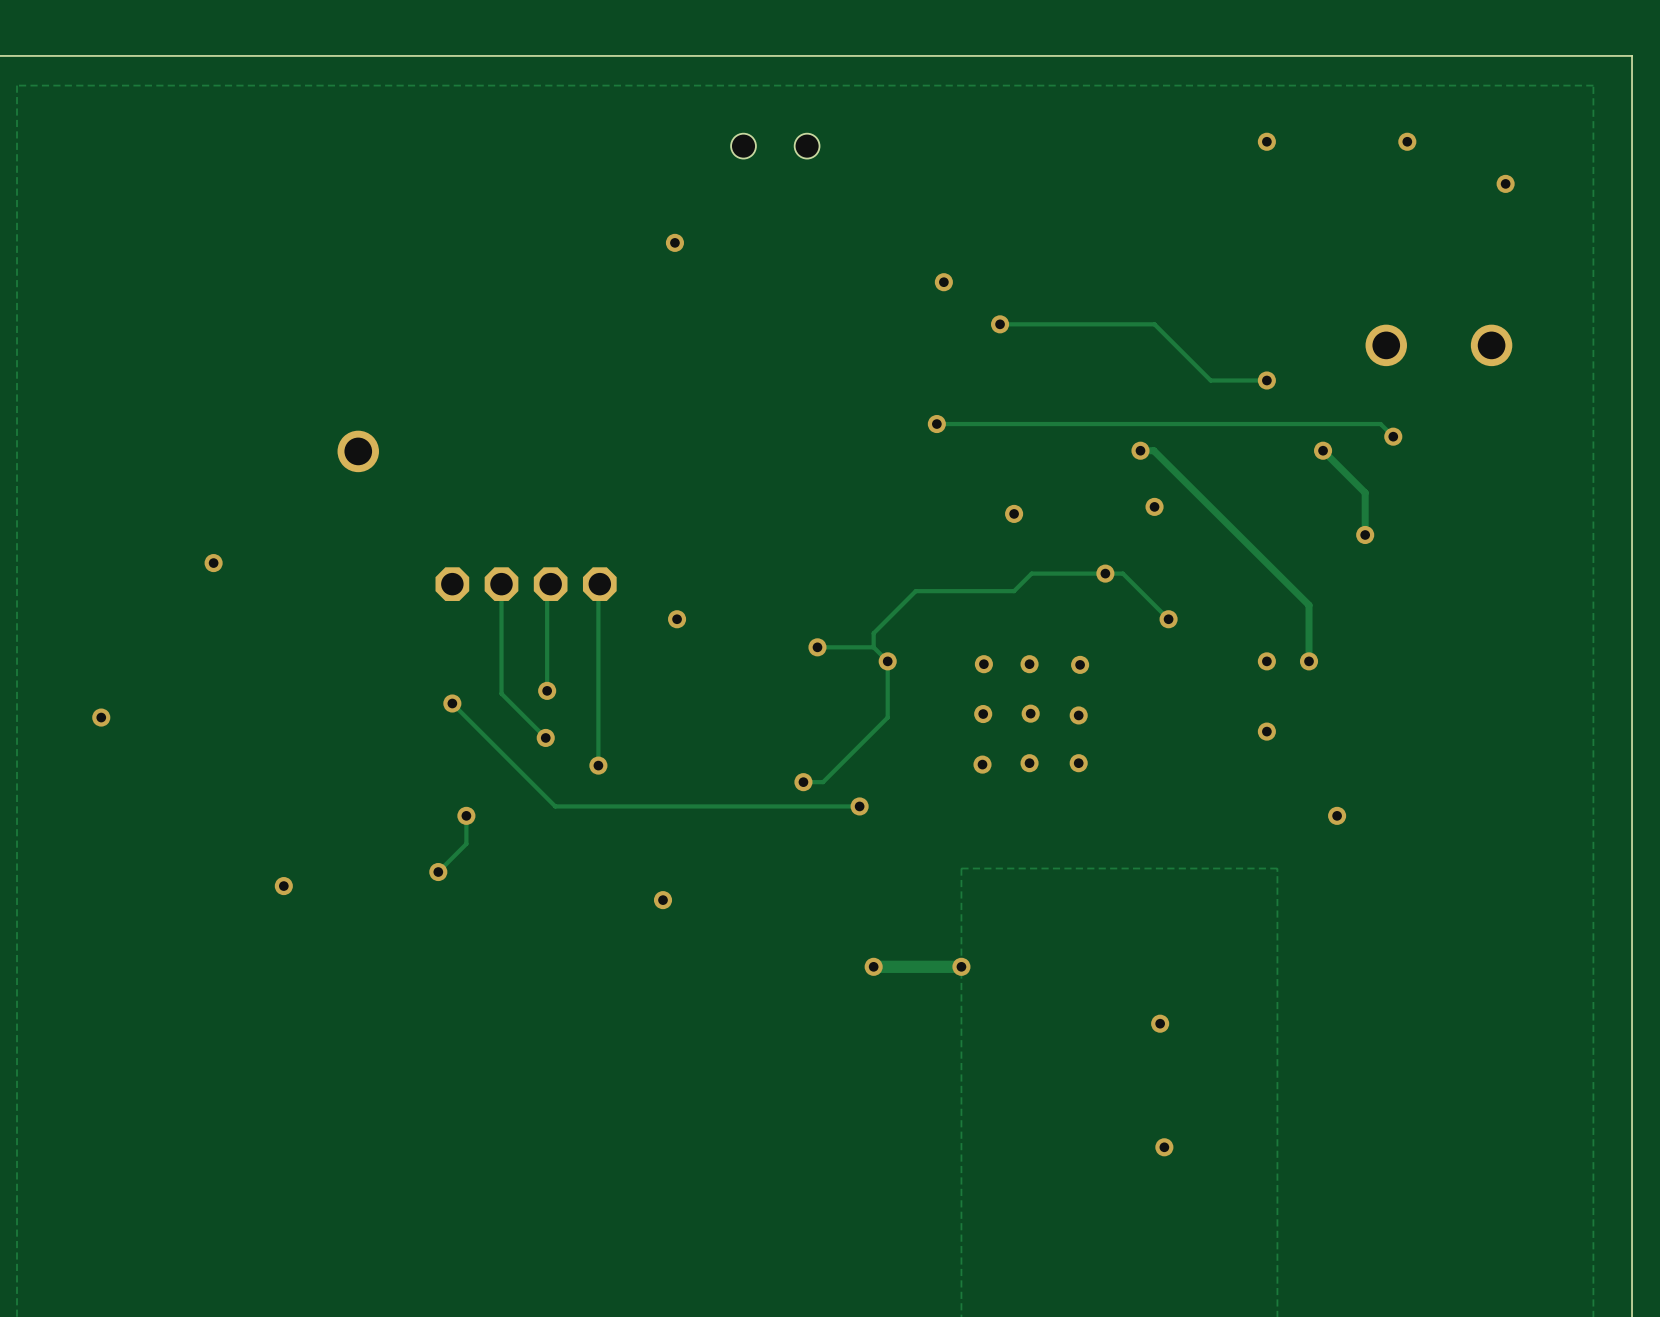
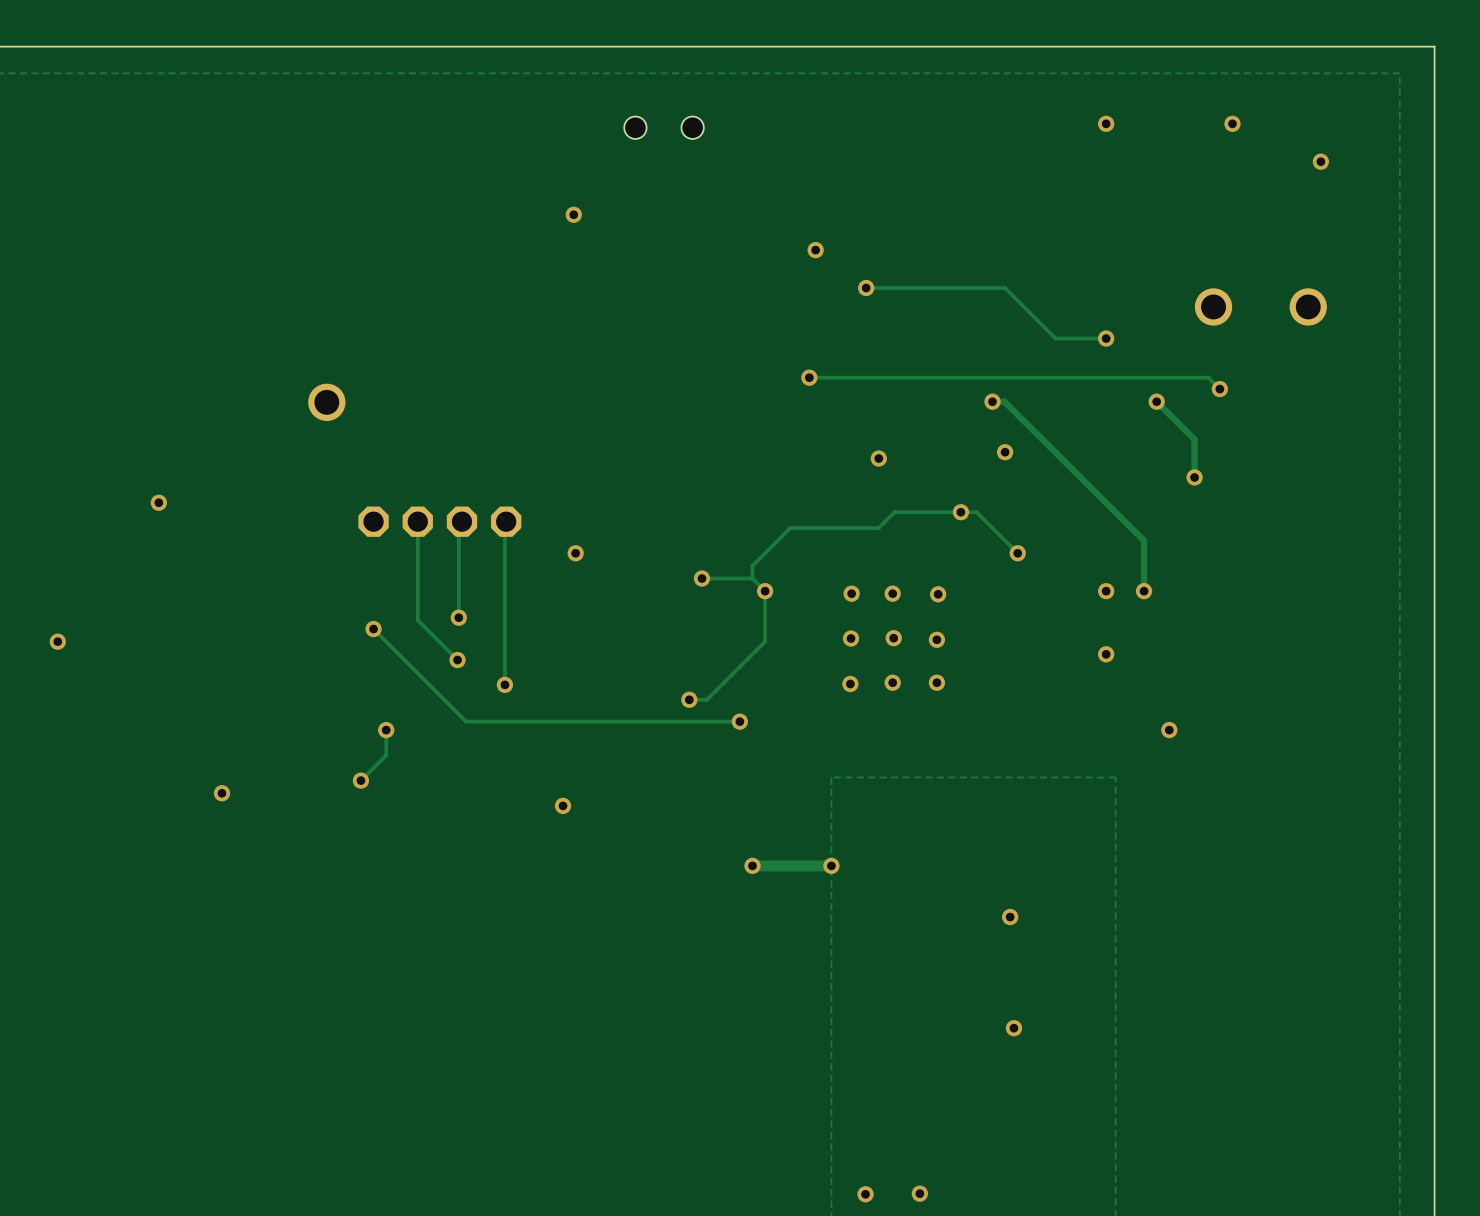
part position: (358, 451) -> (326, 402)

